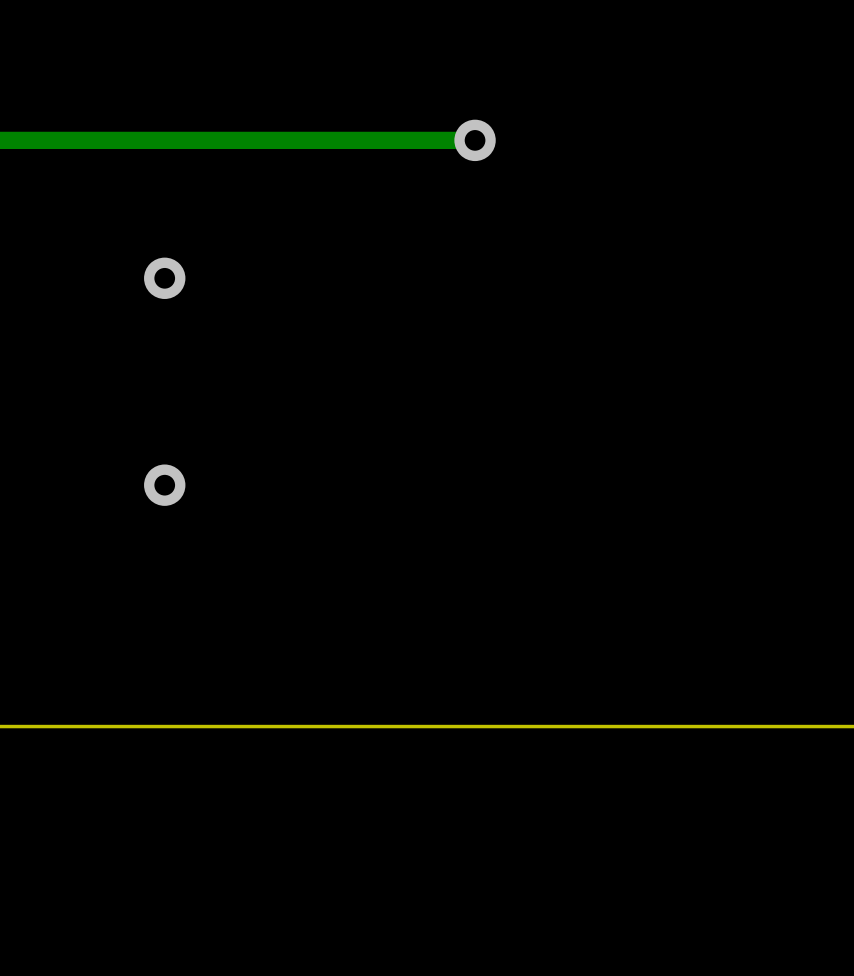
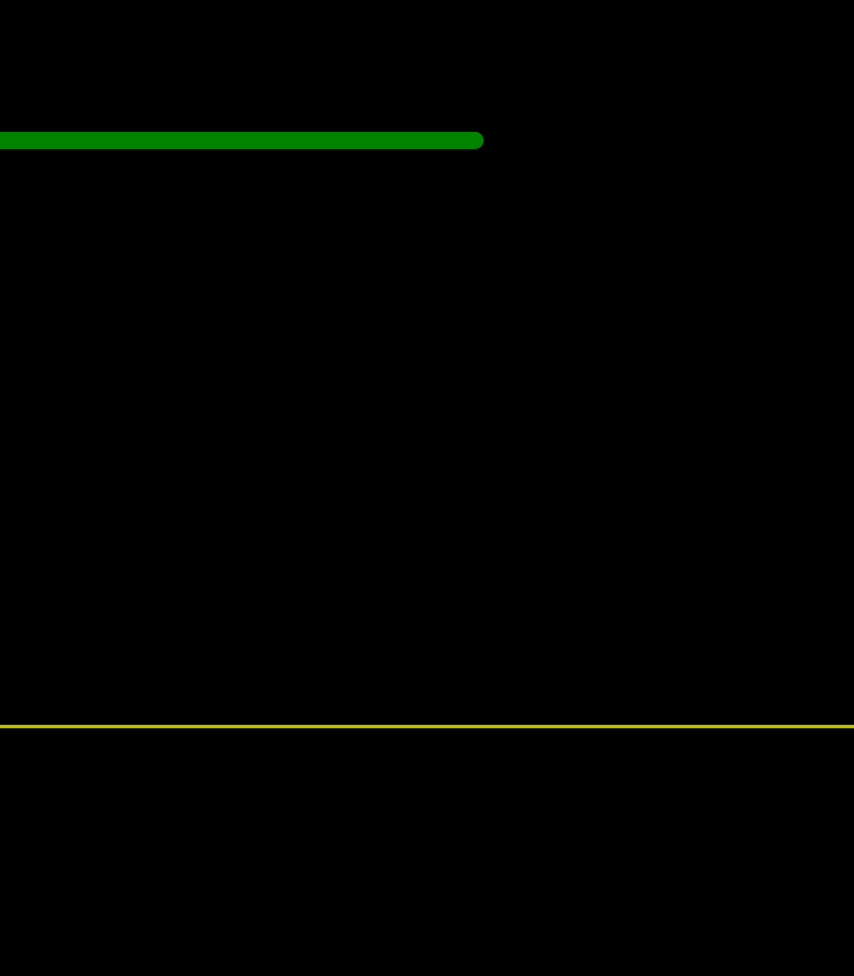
via: (475, 140) -> none
via: (164, 278) -> none
via: (164, 485) -> none

